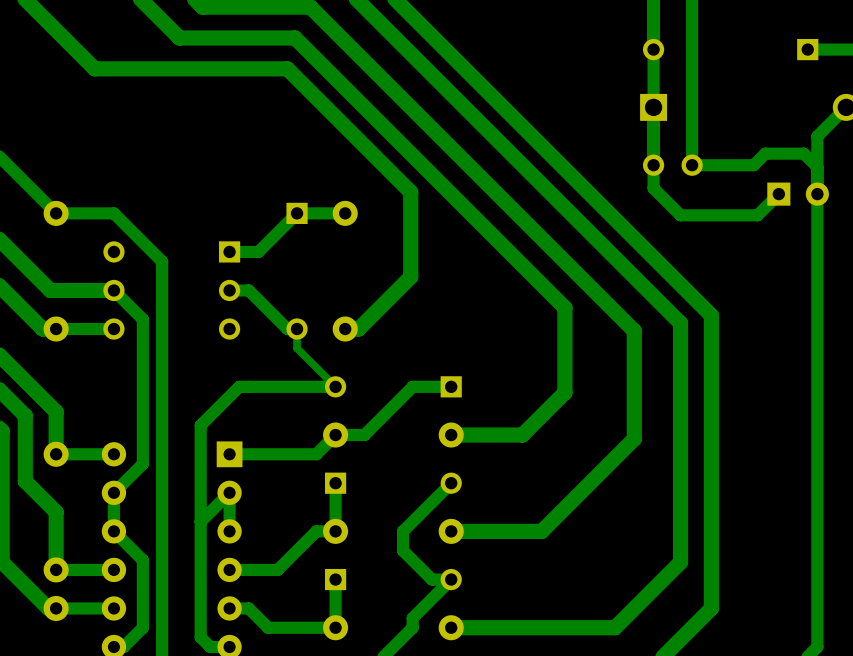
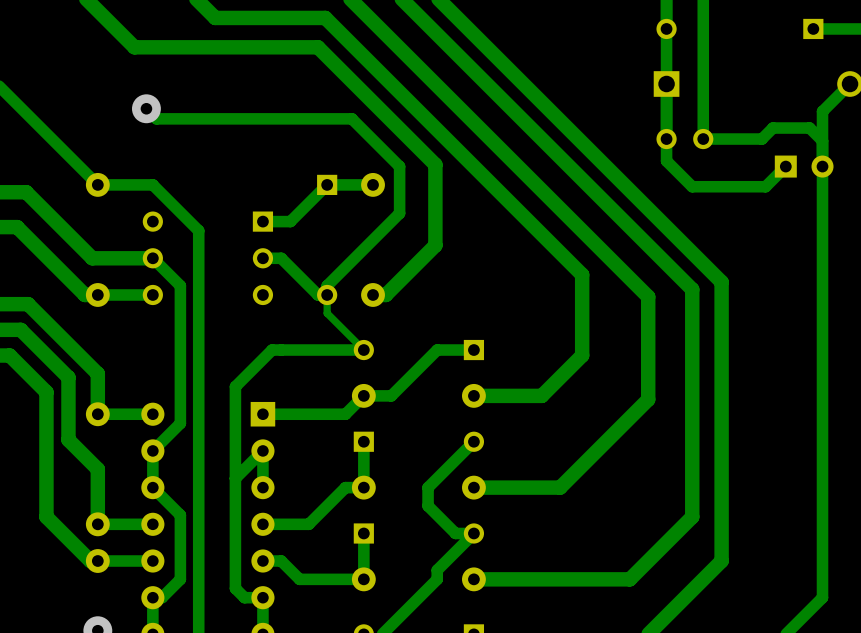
track: none -> (146, 108) (156, 118) (351, 118) (399, 166) (399, 213) (327, 285) (327, 294)
via: none -> (146, 108)

